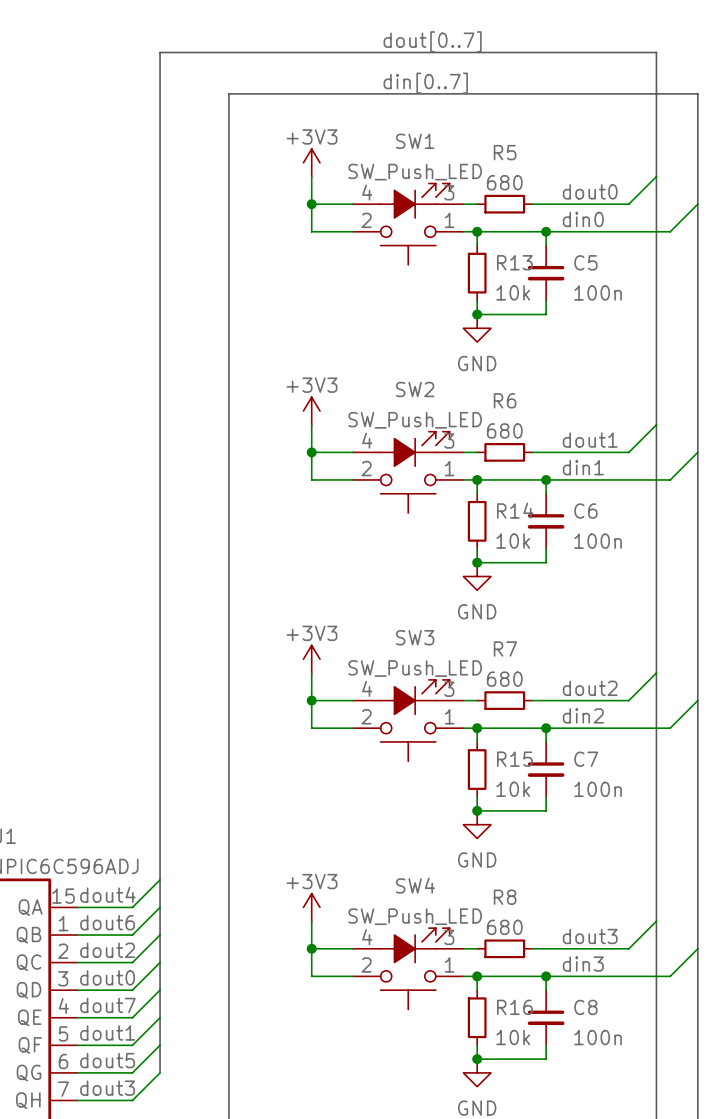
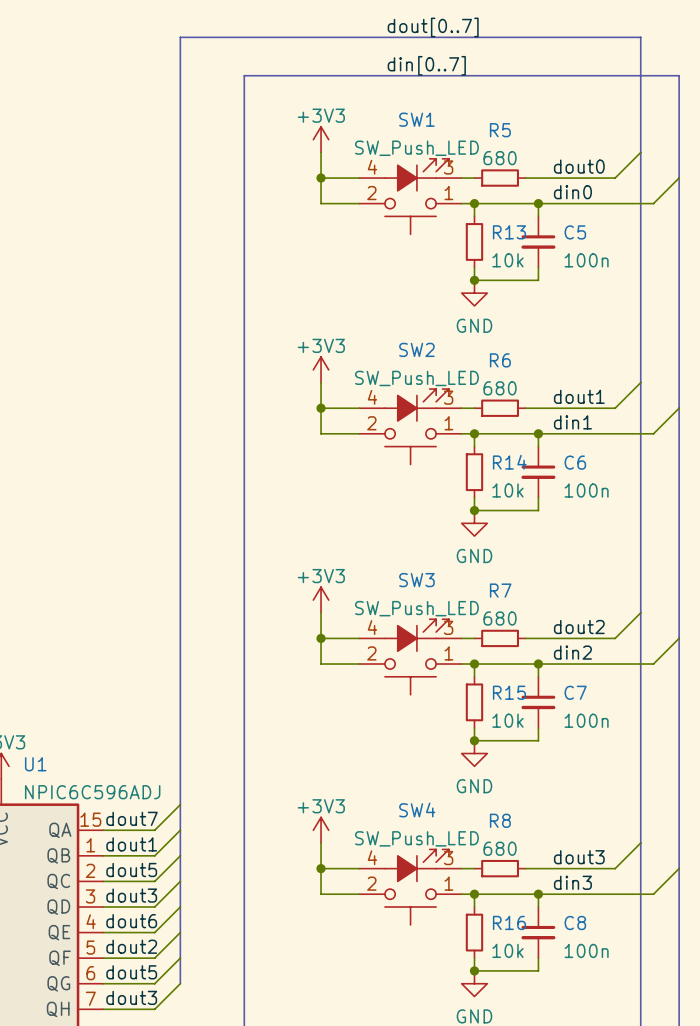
label: dout4 (107, 894) -> dout7 (132, 818)
label: dout6 (107, 922) -> dout1 (131, 844)
label: dout2 (107, 950) -> dout5 (131, 870)
label: dout0 (107, 977) -> dout3 (131, 895)
label: dout7 (107, 1005) -> dout6 (131, 921)
label: dout1 (107, 1033) -> dout2 (131, 946)

